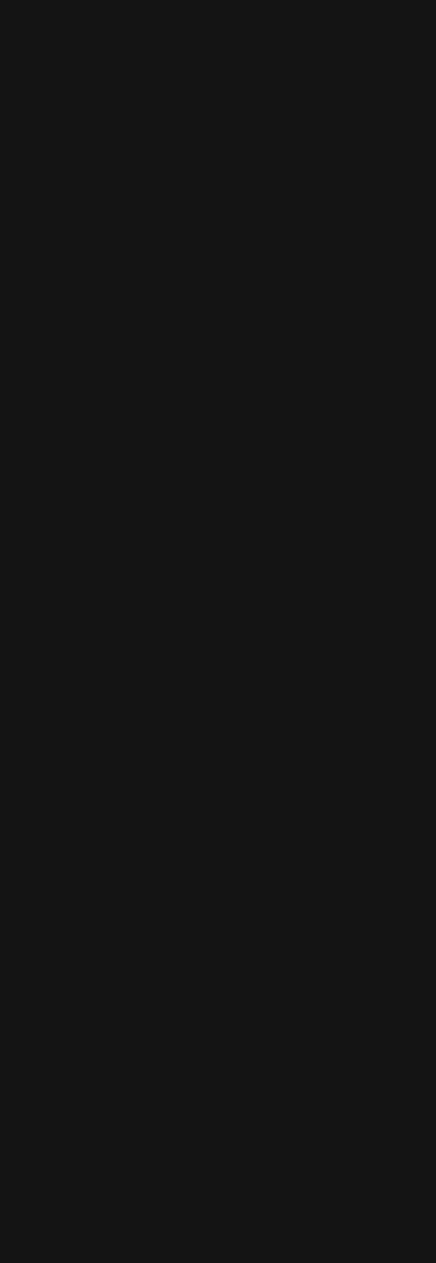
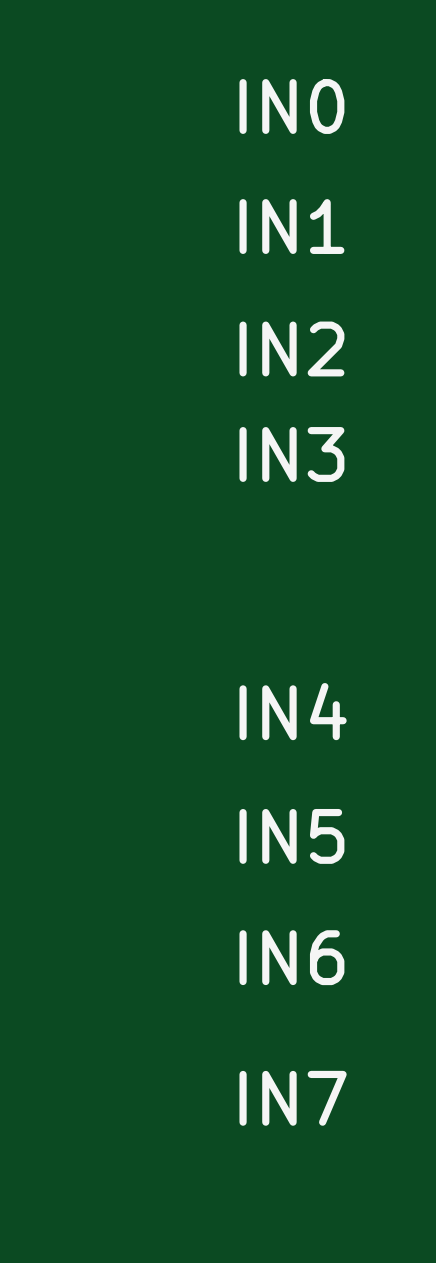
text: none -> IN0 (291, 106)
text: none -> IN1 (291, 226)
text: none -> IN2 (291, 348)
text: none -> IN3 (291, 454)
text: none -> IN4 (293, 711)
text: none -> IN5 (291, 836)
text: none -> IN6 (291, 957)
text: none -> IN7 (293, 1098)

